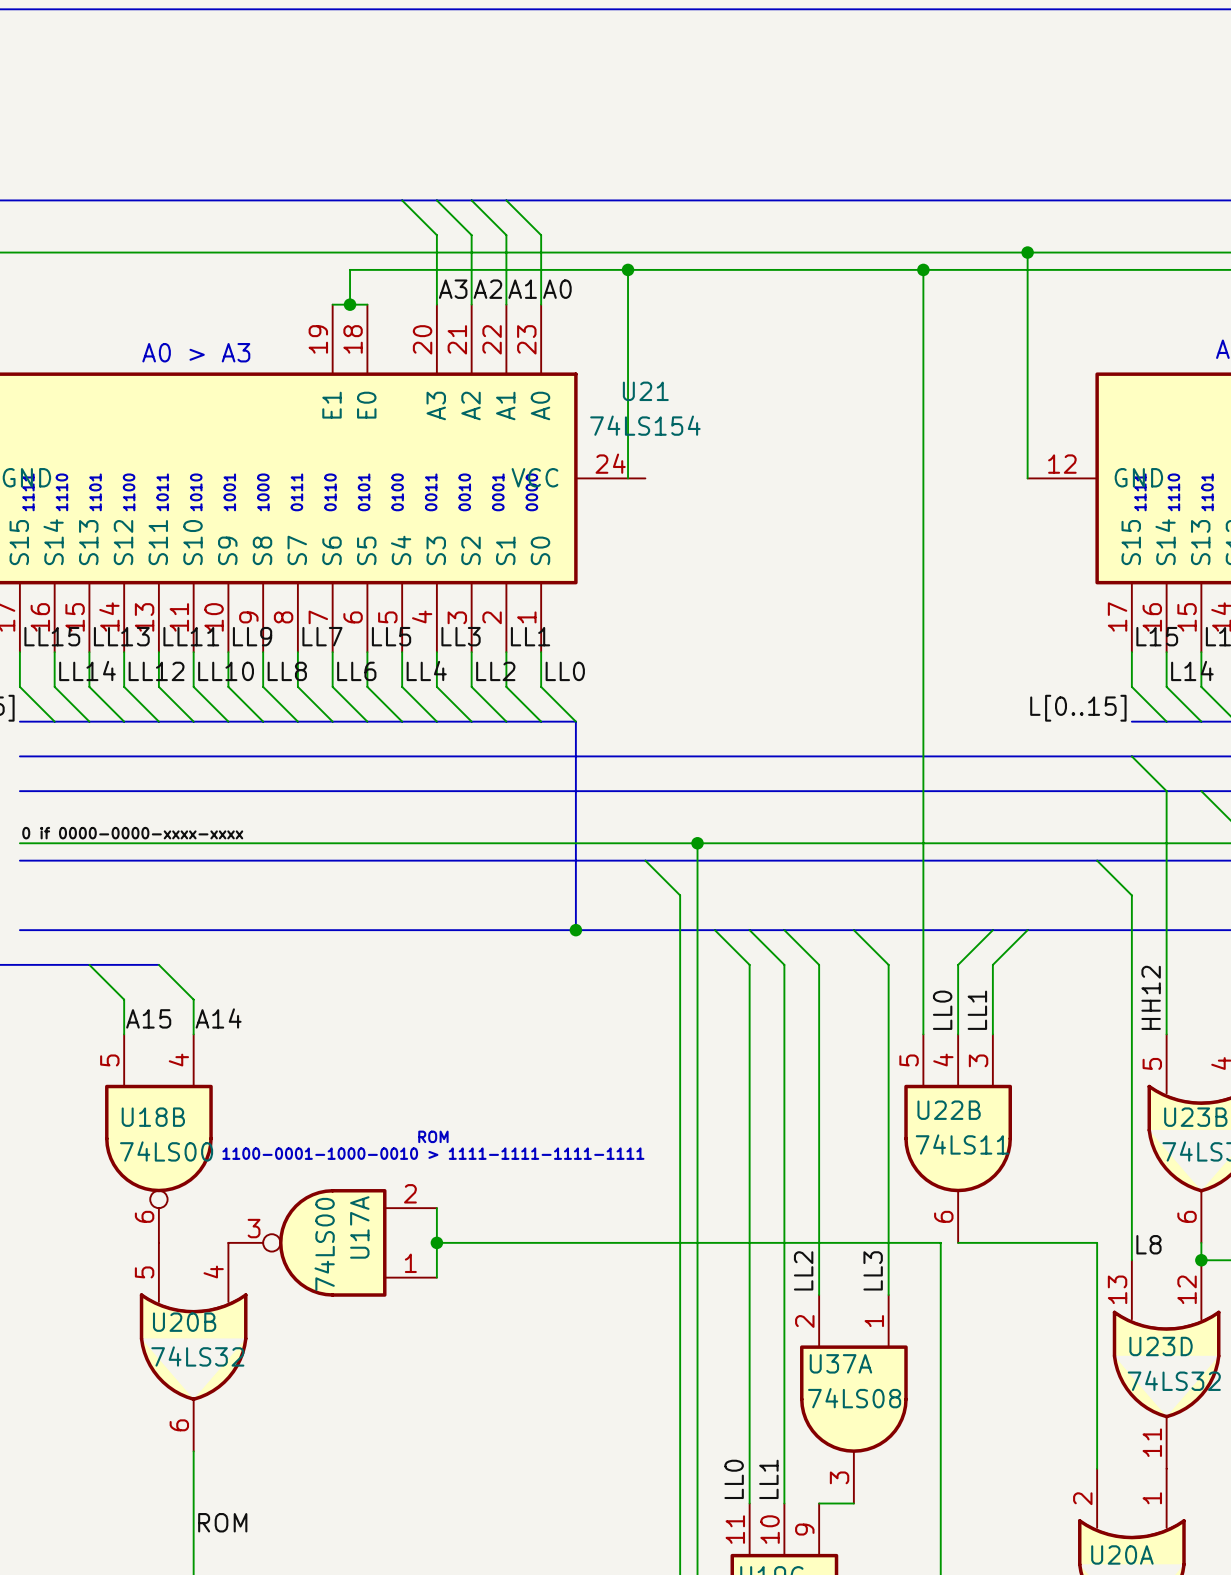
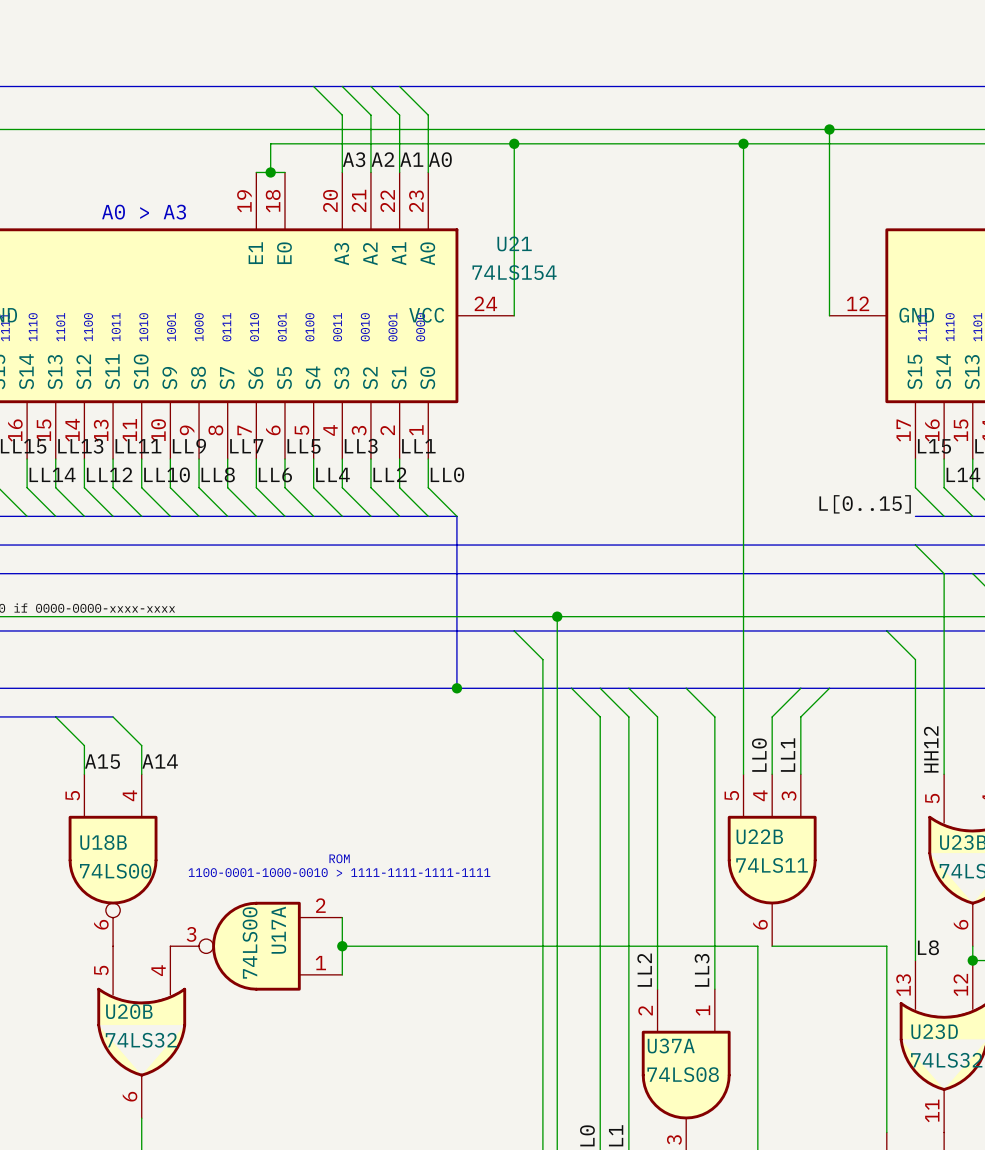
wire: (628, 269) (628, 478) -> (514, 143) (514, 315)
junction position: (628, 269) -> (514, 143)

